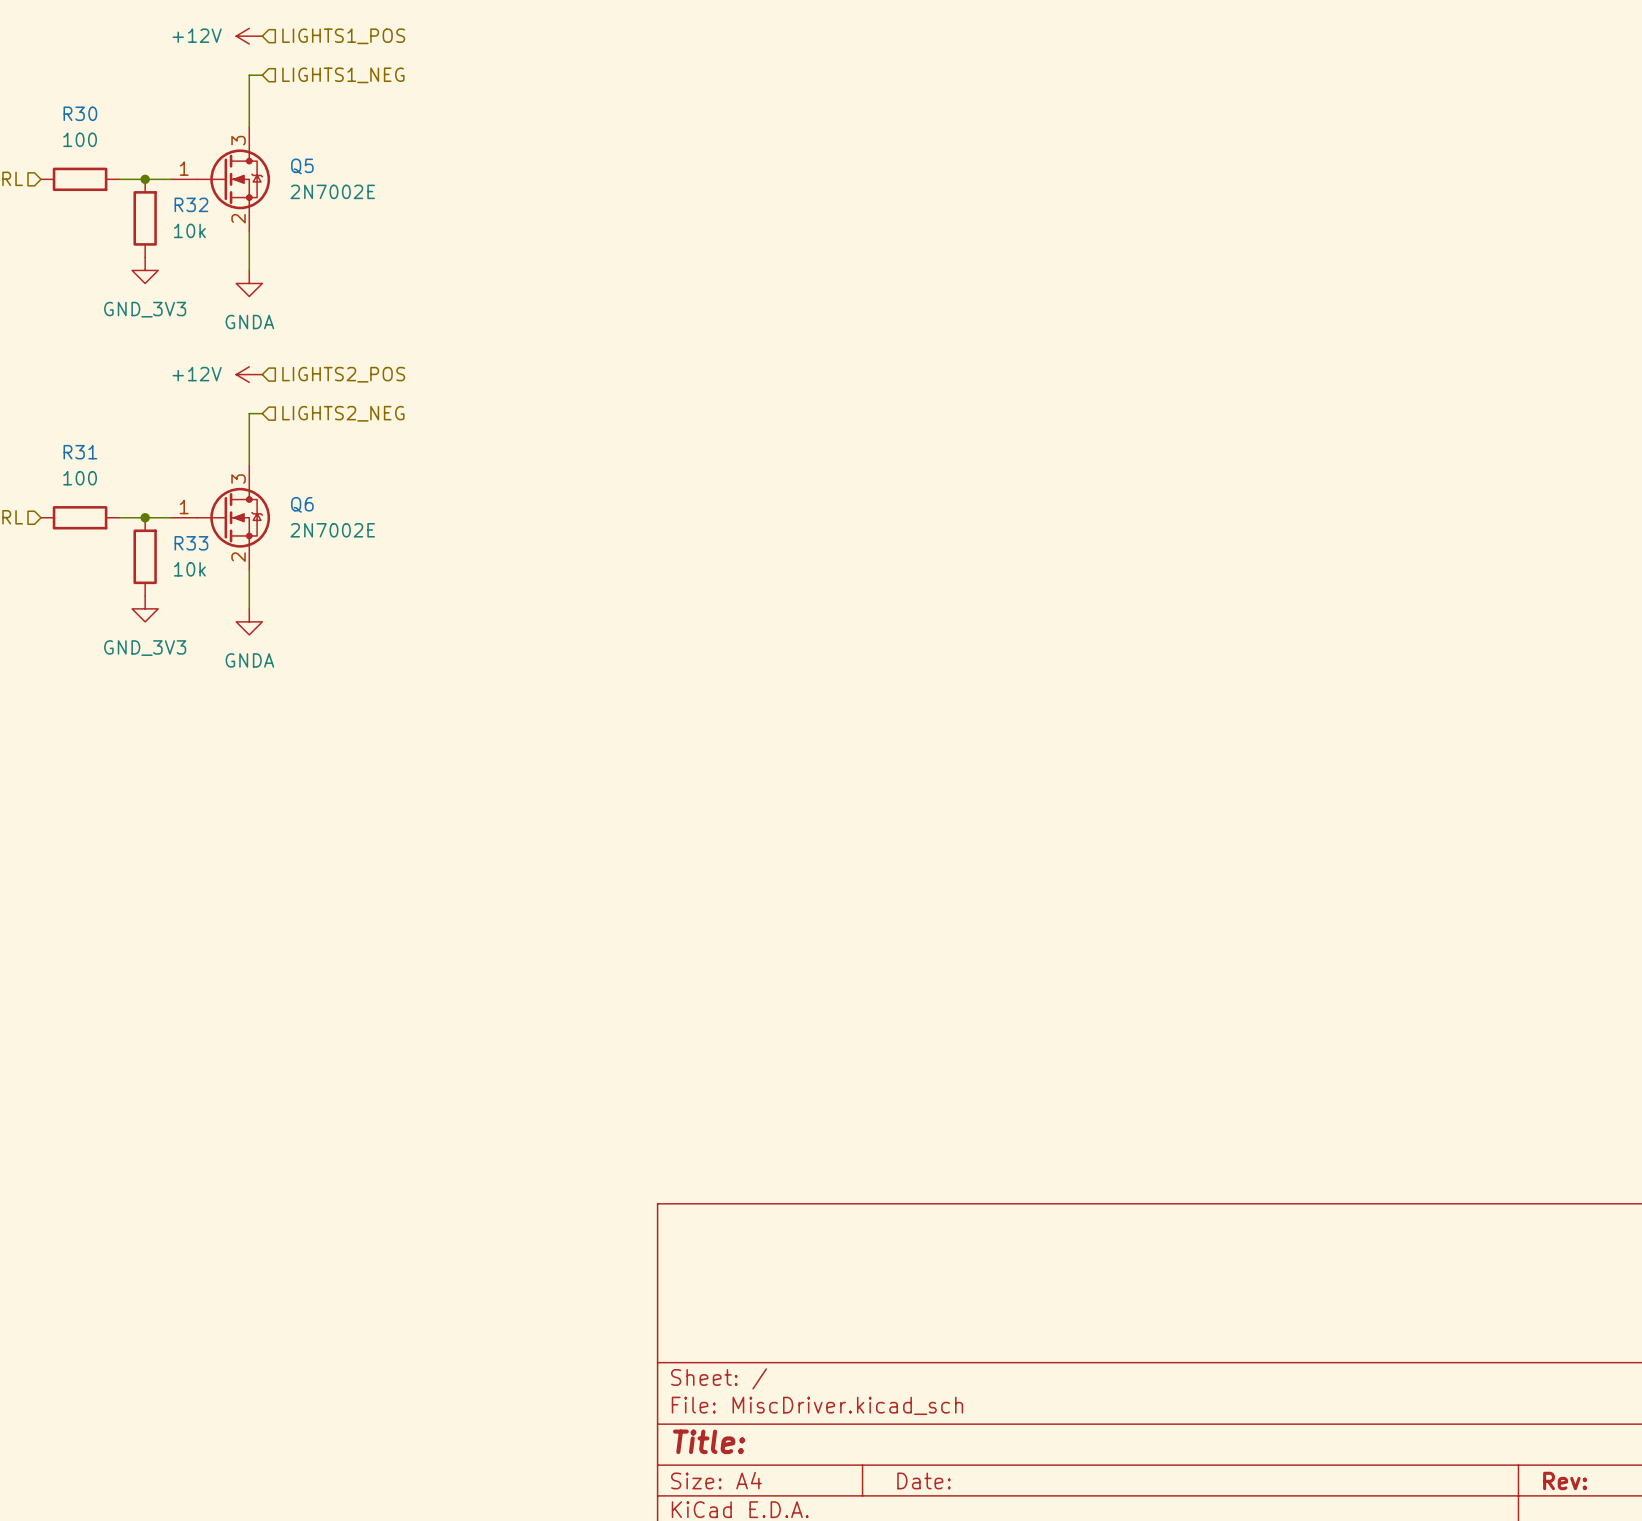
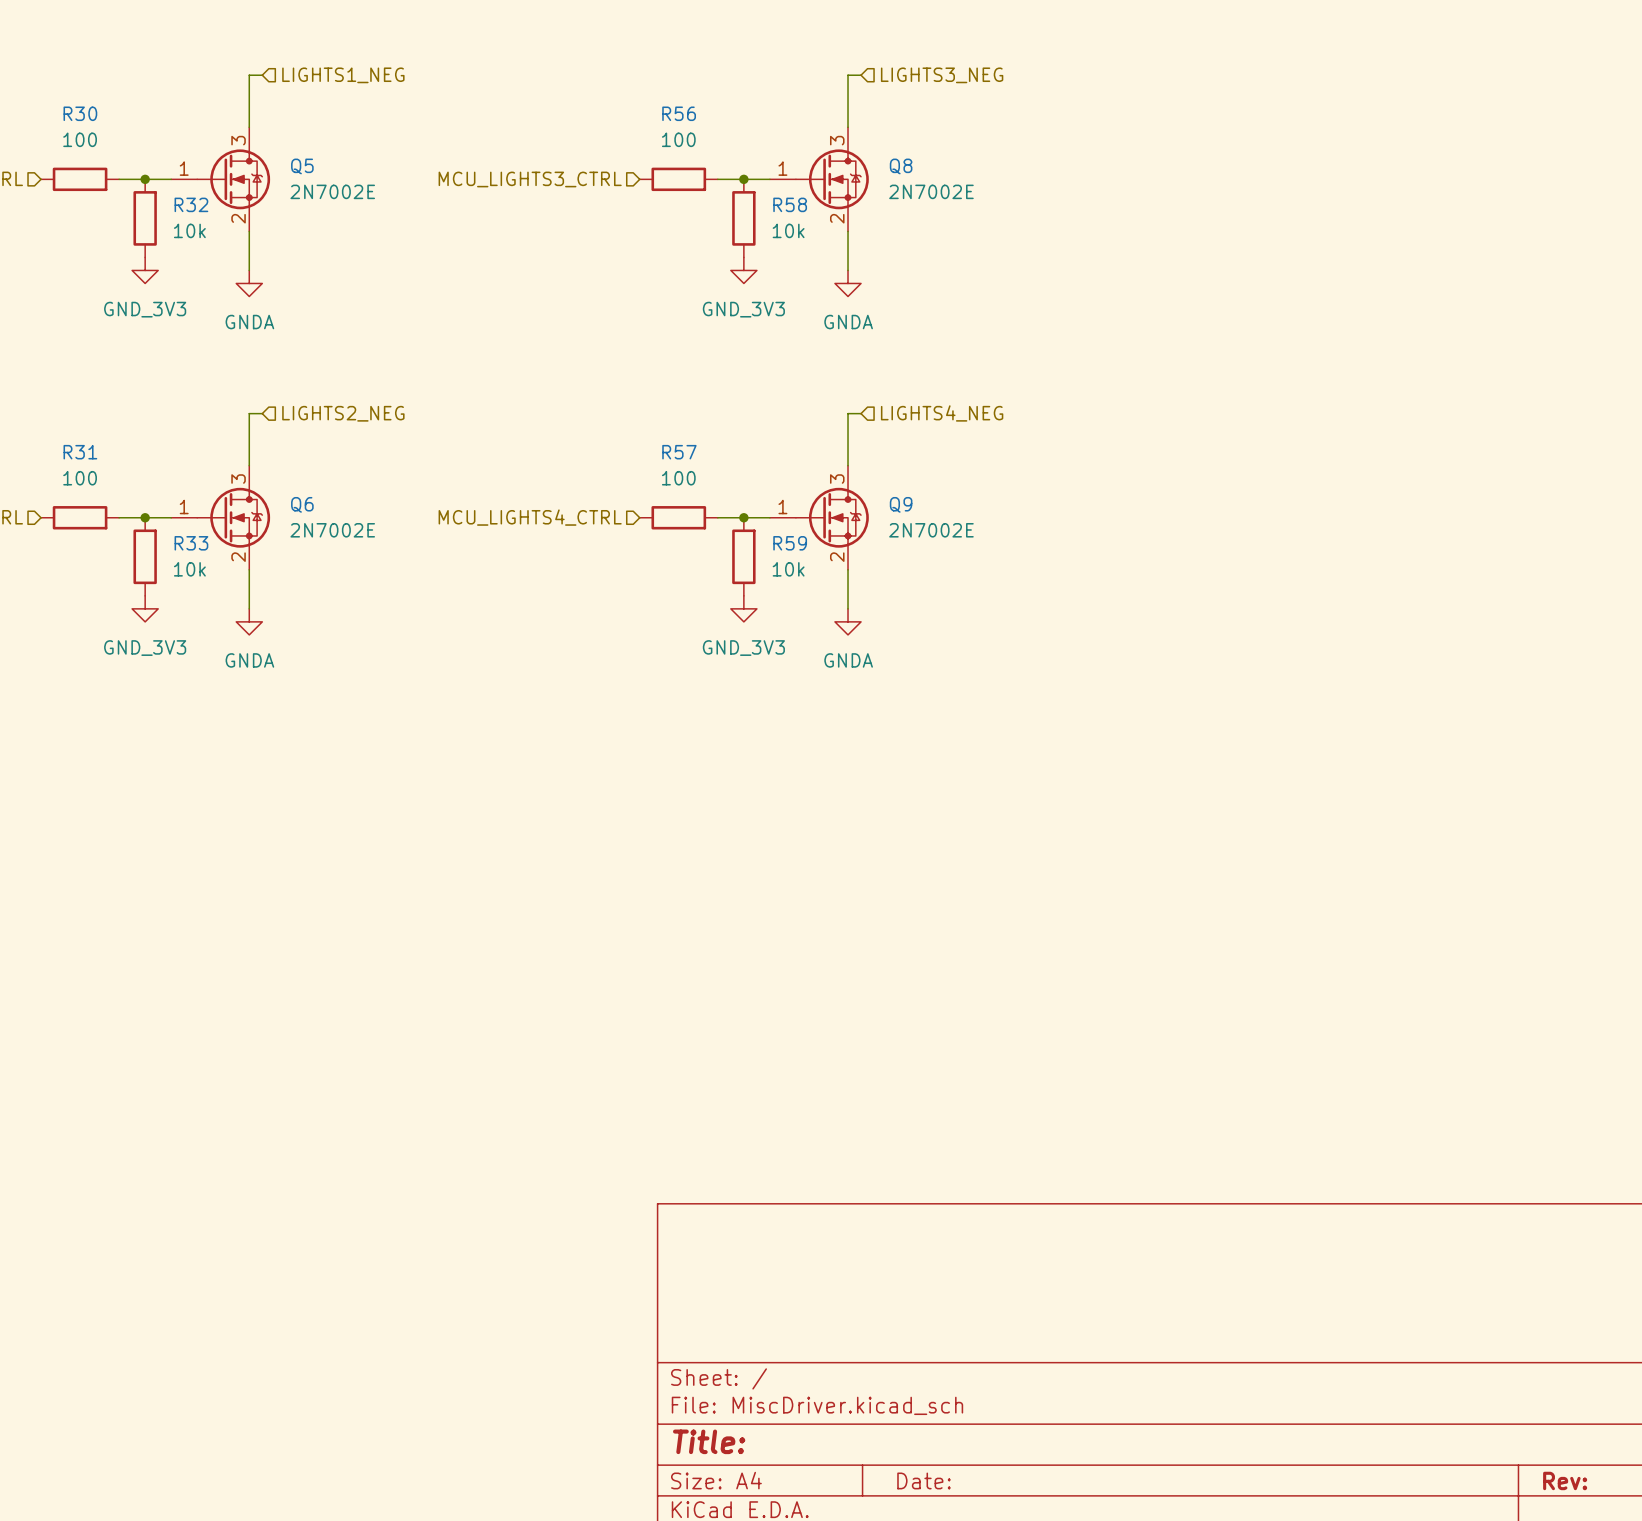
power symbol: +12V (249, 36) -> none
hierarchical label: LIGHTS1_POS (343, 36) -> none
wire: none -> (861, 75) (848, 75) (848, 127)
hierarchical label: none -> LIGHTS3_NEG (942, 75)
hierarchical label: none -> MCU_LIGHTS3_CTRL (530, 179)
R56: none -> 100 (678, 179)
wire: none -> (717, 179) (769, 179)
junction: none -> (743, 179)
Q8: none -> 2N7002E (819, 179)
R58: none -> 10k (743, 218)
wire: none -> (848, 231) (848, 270)
power symbol: none -> GND_3V3 (743, 270)
power symbol: none -> GNDA (848, 283)
power symbol: +12V (249, 374) -> none
hierarchical label: LIGHTS2_POS (343, 374) -> none
wire: none -> (861, 413) (848, 413) (848, 465)
hierarchical label: none -> LIGHTS4_NEG (942, 413)
hierarchical label: none -> MCU_LIGHTS4_CTRL (530, 517)
R57: none -> 100 (678, 517)
wire: none -> (717, 517) (769, 517)
junction: none -> (743, 517)
Q9: none -> 2N7002E (819, 517)
R59: none -> 10k (743, 556)
wire: none -> (848, 569) (848, 608)
power symbol: none -> GND_3V3 (743, 608)
power symbol: none -> GNDA (848, 621)

